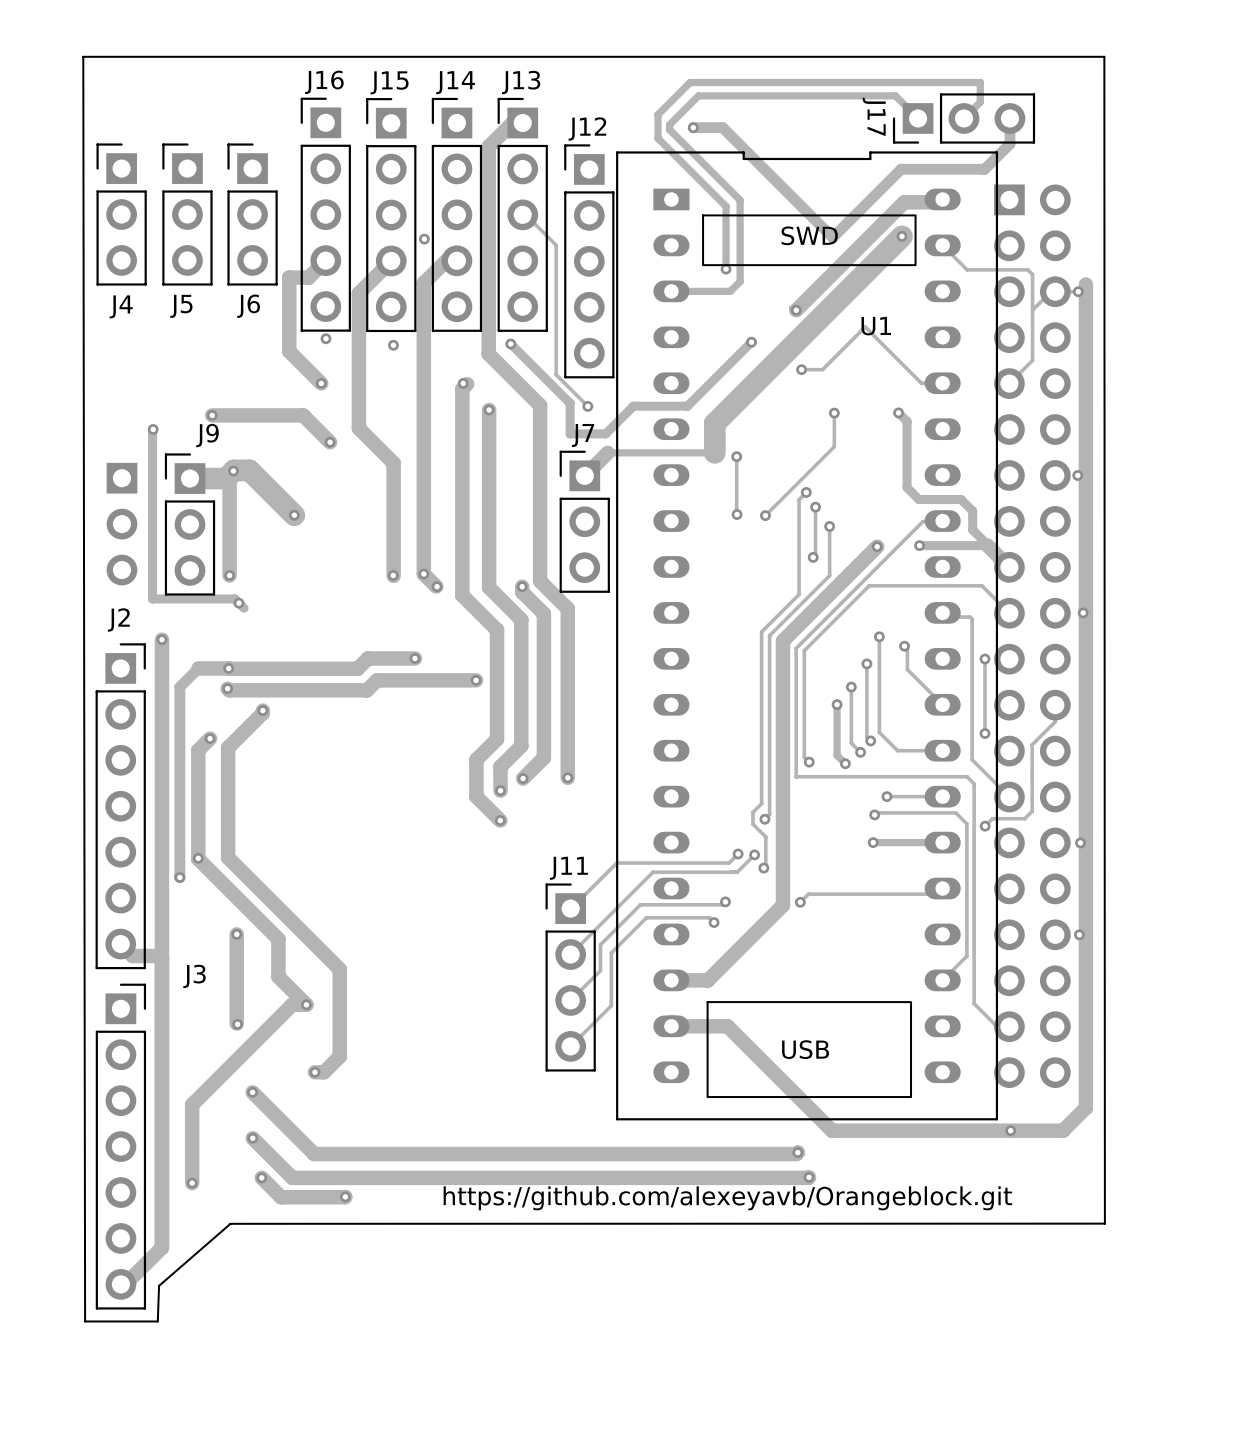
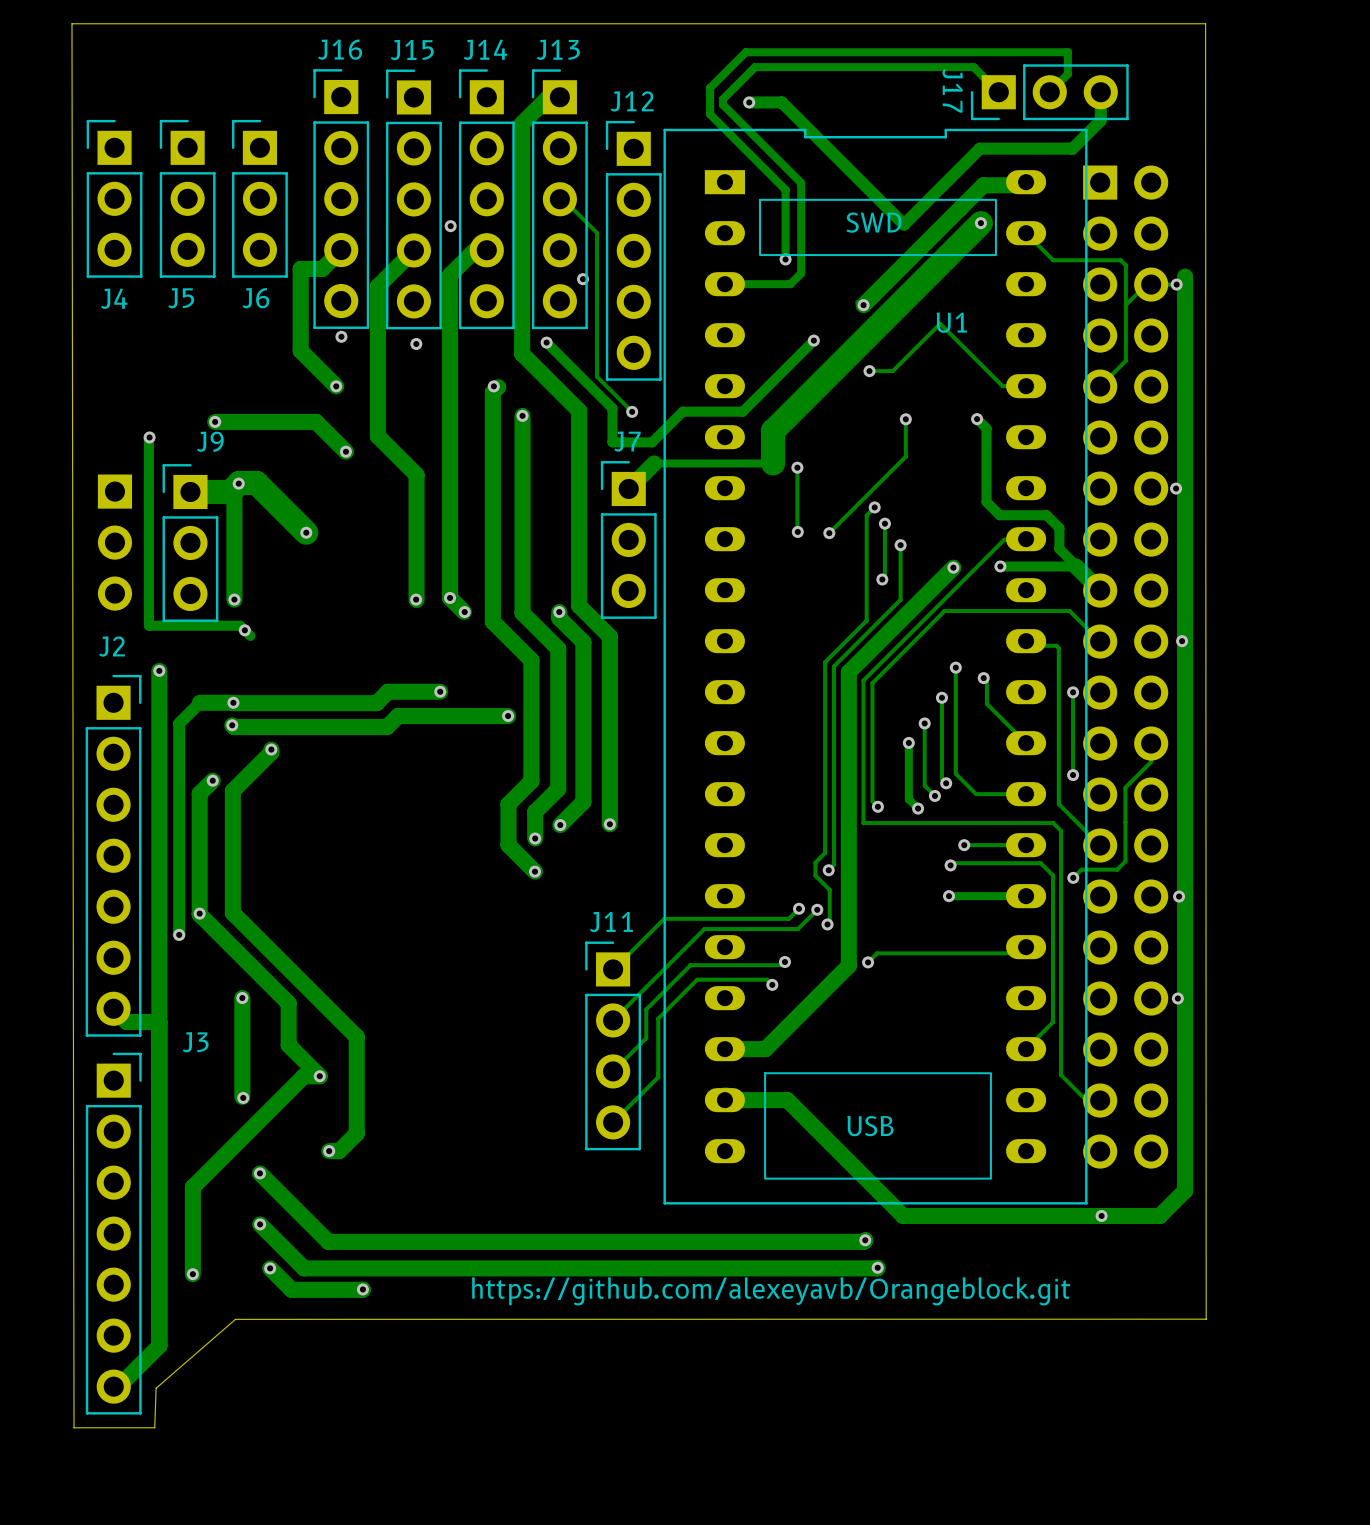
via: none -> (582, 279)

